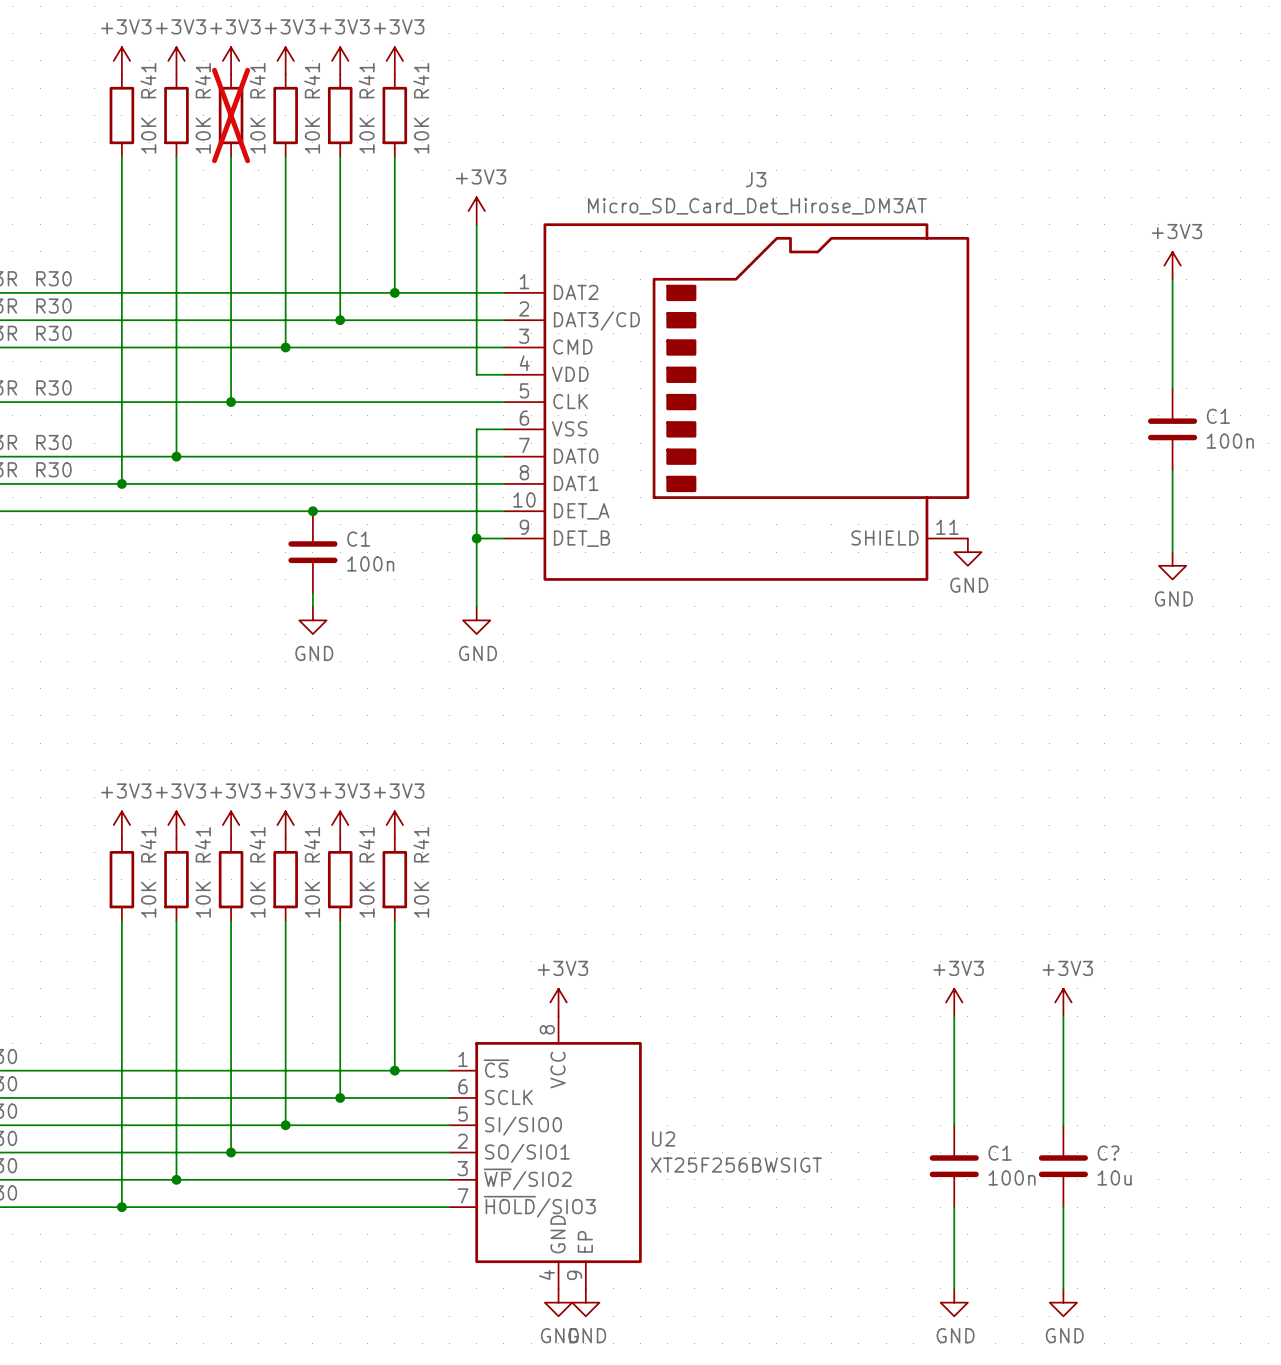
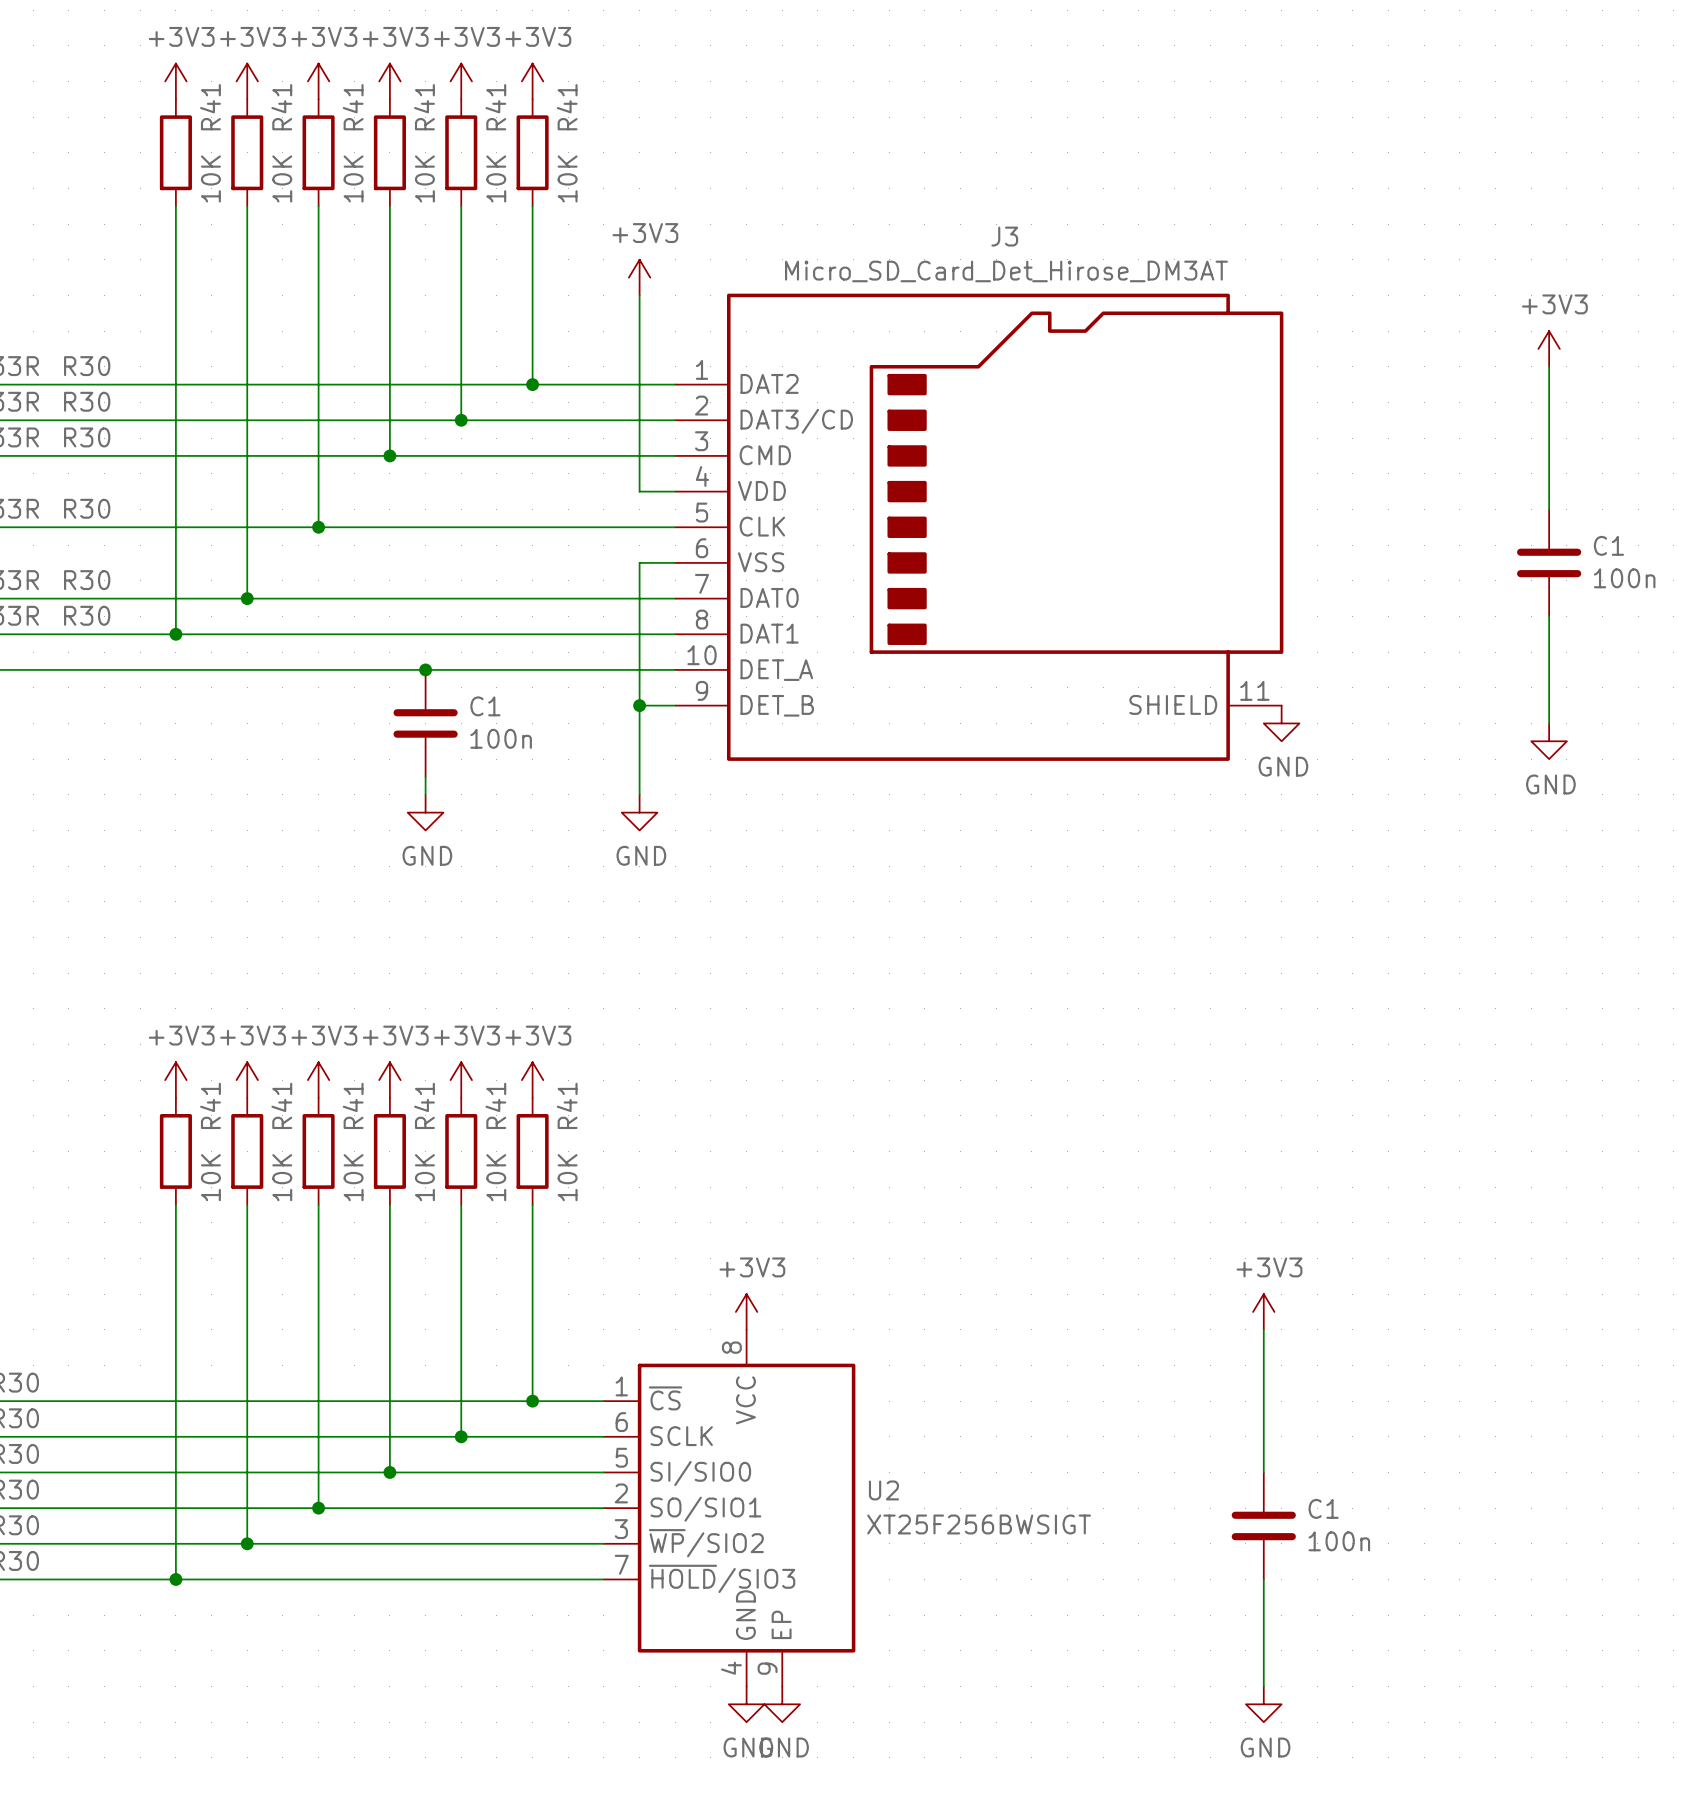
R41 do-not-place cross: (231, 115) -> none
power symbol: +3V3 (1063, 1002) -> none
wire: (1063, 1016) (1063, 1125) -> none
C?: 10u (1063, 1166) -> none
wire: (1063, 1207) (1063, 1288) -> none
power symbol: GND (1063, 1302) -> none

